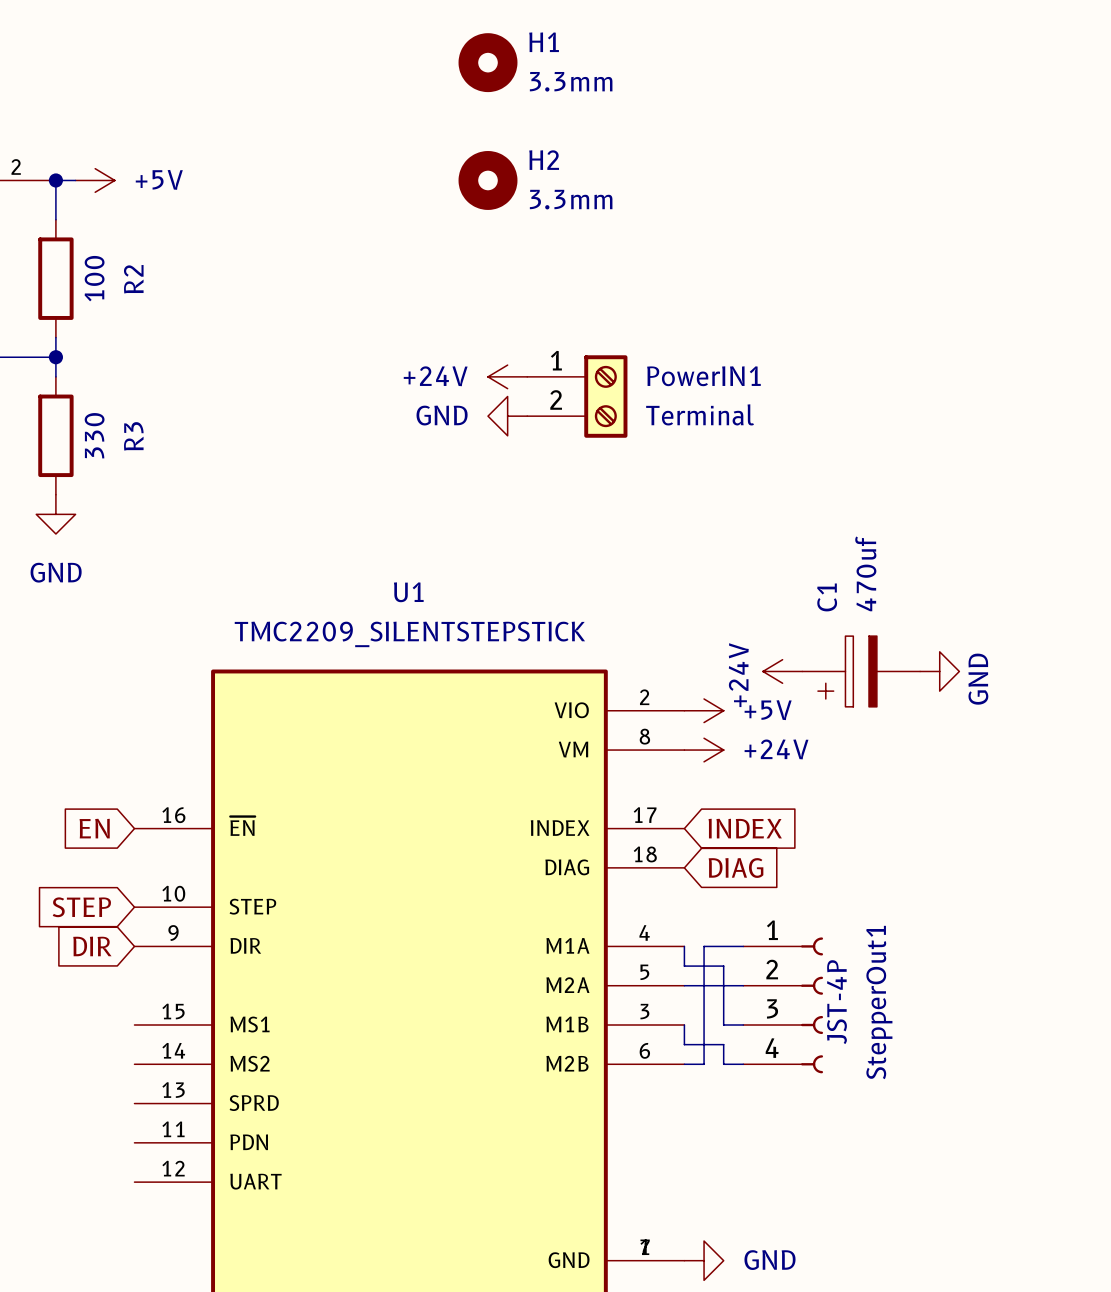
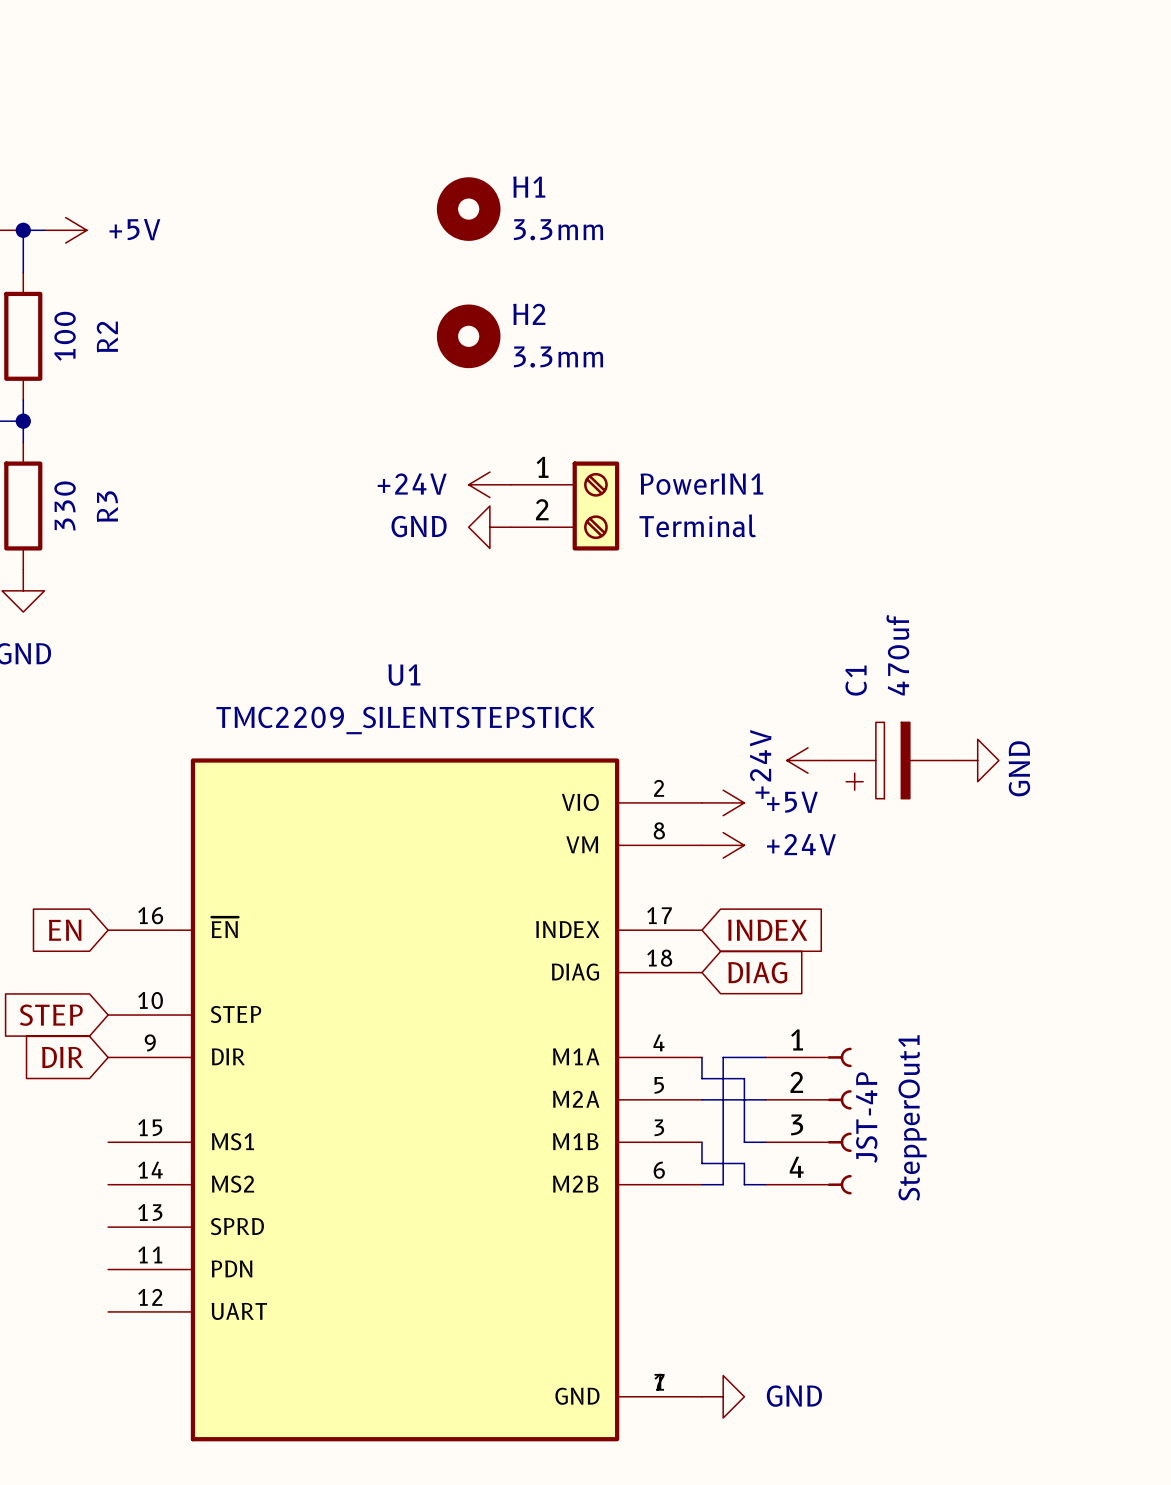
H1 position: (488, 62) -> (468, 209)
H2 position: (488, 180) -> (468, 336)
power symbol position: +24V (507, 376) -> +24V (489, 484)
PowerIN1 position: (577, 396) -> (565, 506)
power symbol position: GND (507, 416) -> GND (489, 527)

